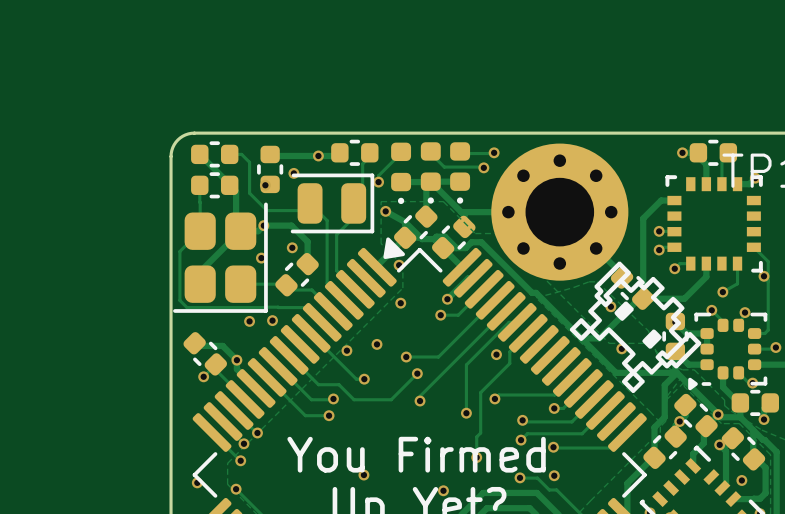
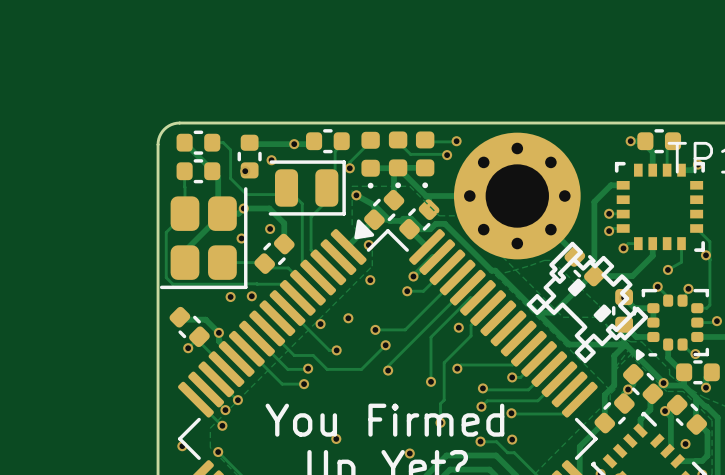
via: (610, 306) -> none
via: (621, 348) -> none

